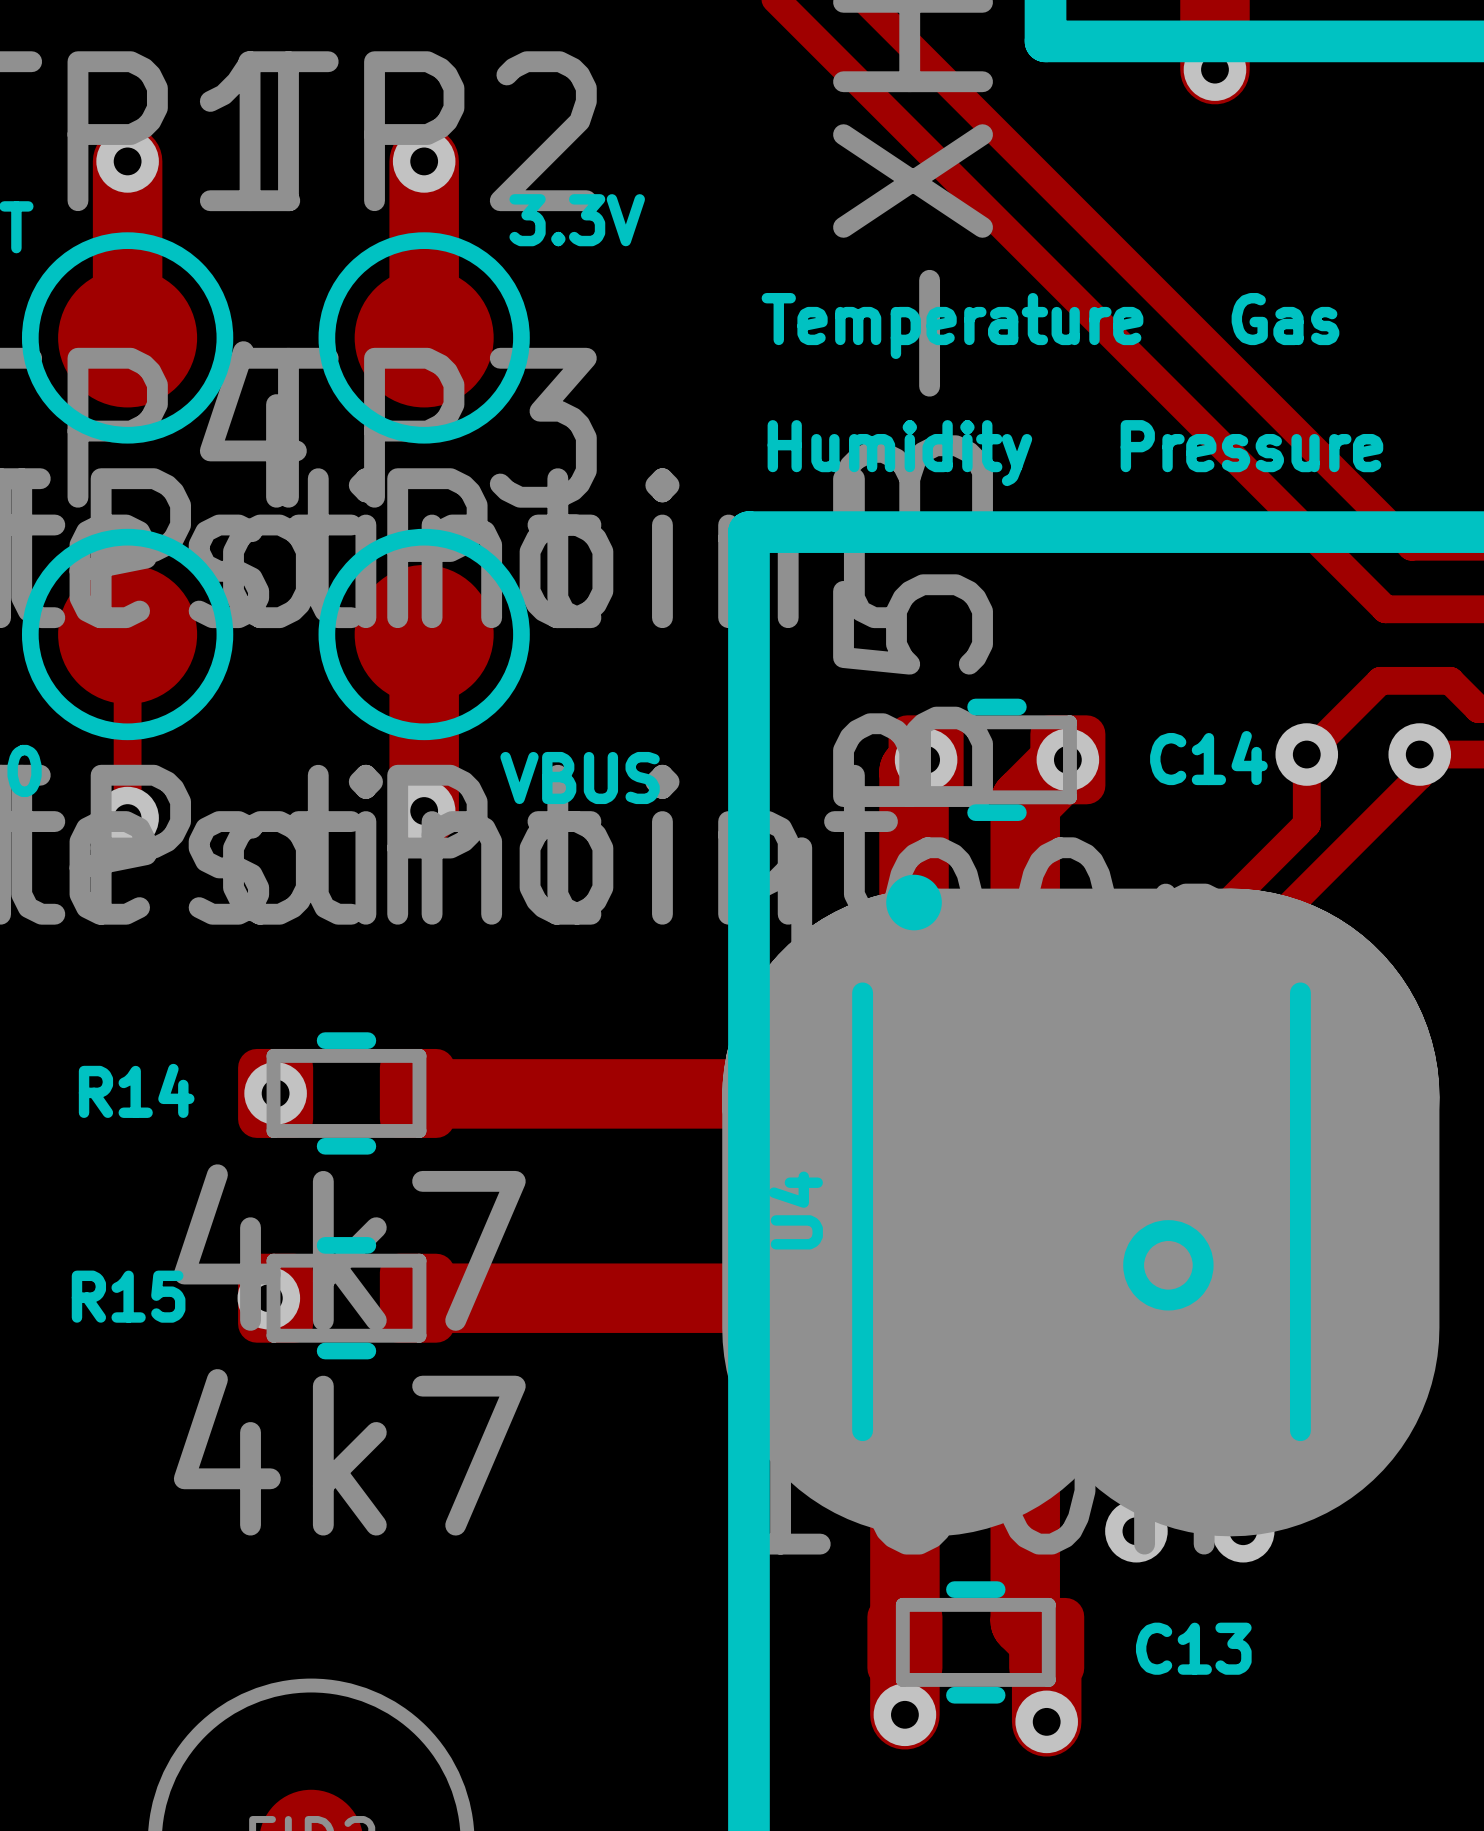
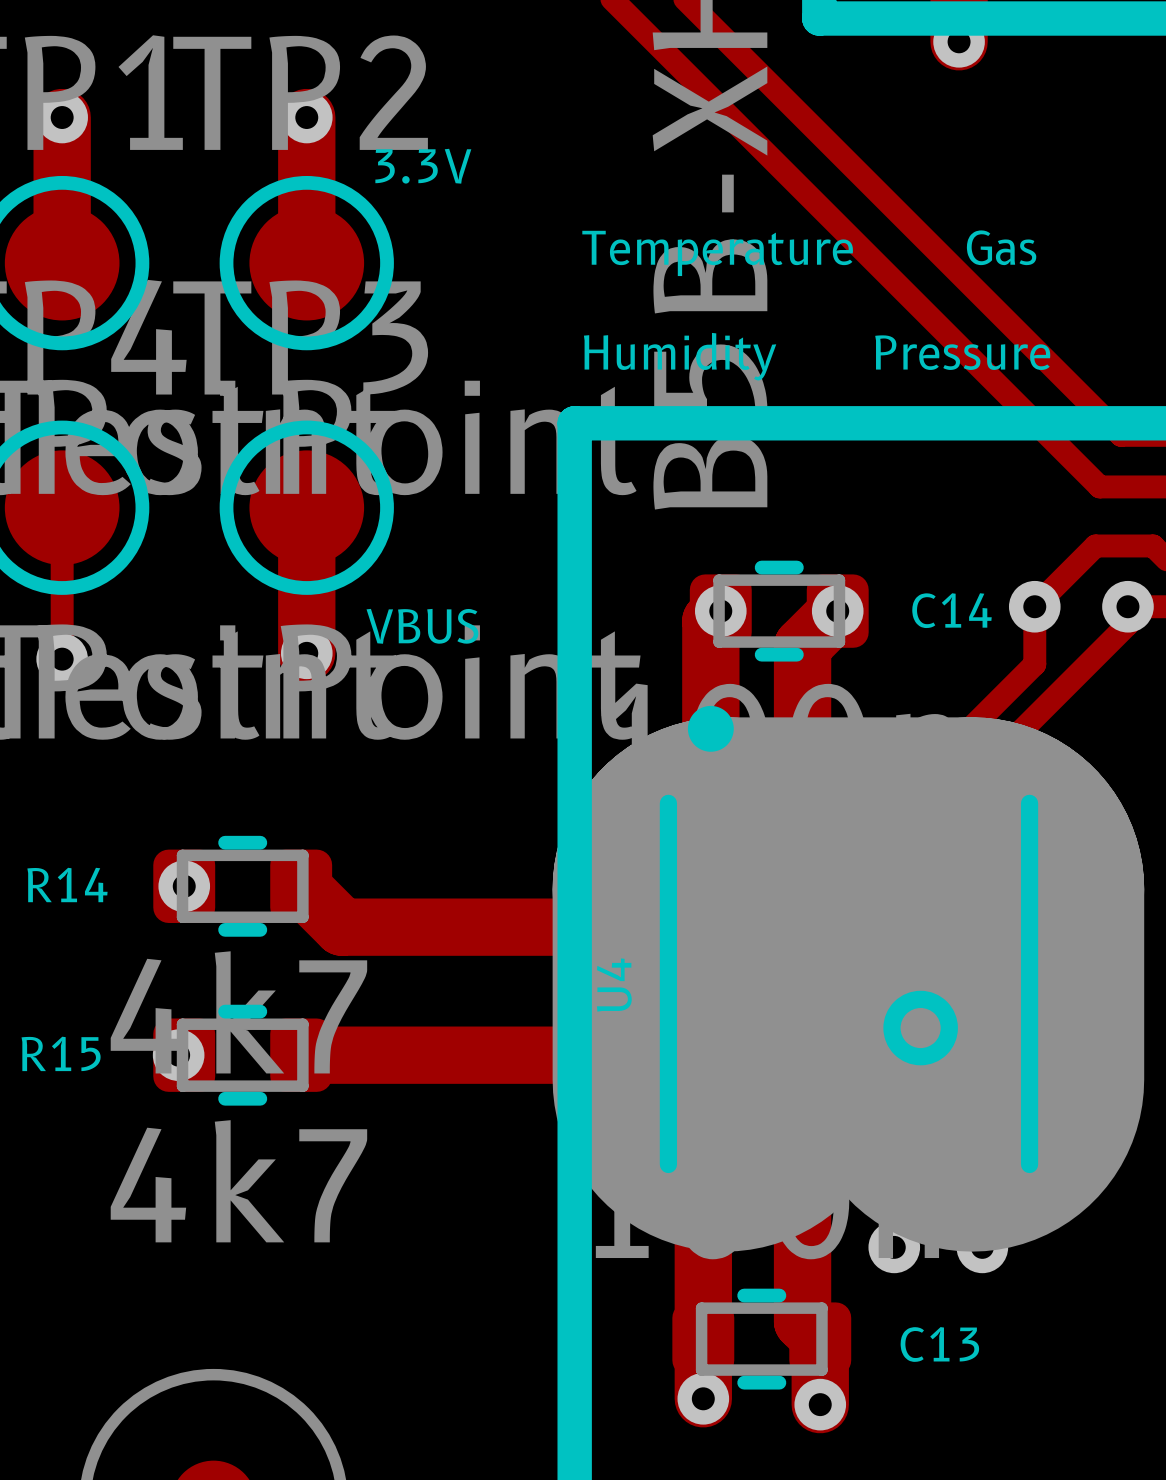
track: (417, 1093) (826, 1093) (875, 1142) -> (301, 886) (342, 927) (678, 927)

